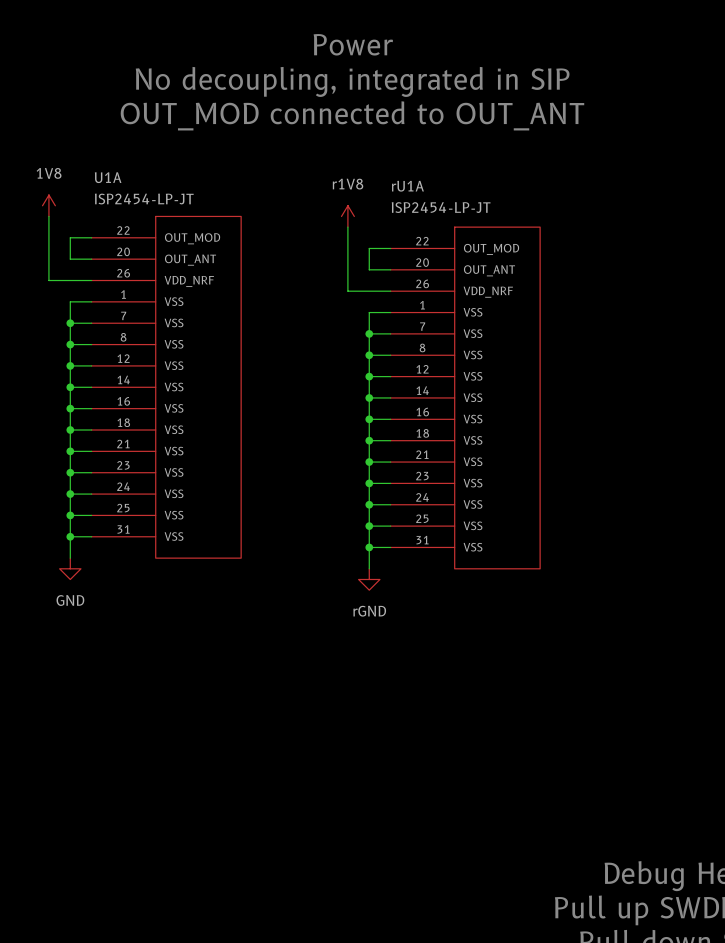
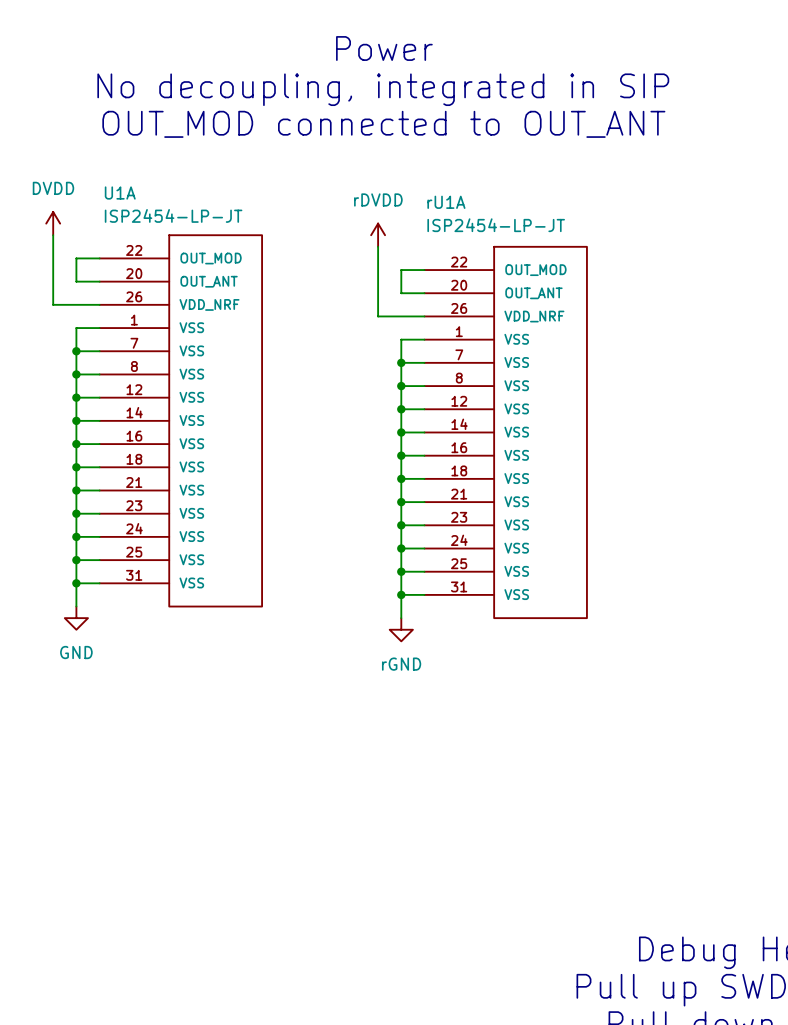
power symbol: 1V8 (48, 205) -> DVDD (53, 223)
power symbol: r1V8 (347, 216) -> rDVDD (378, 235)

